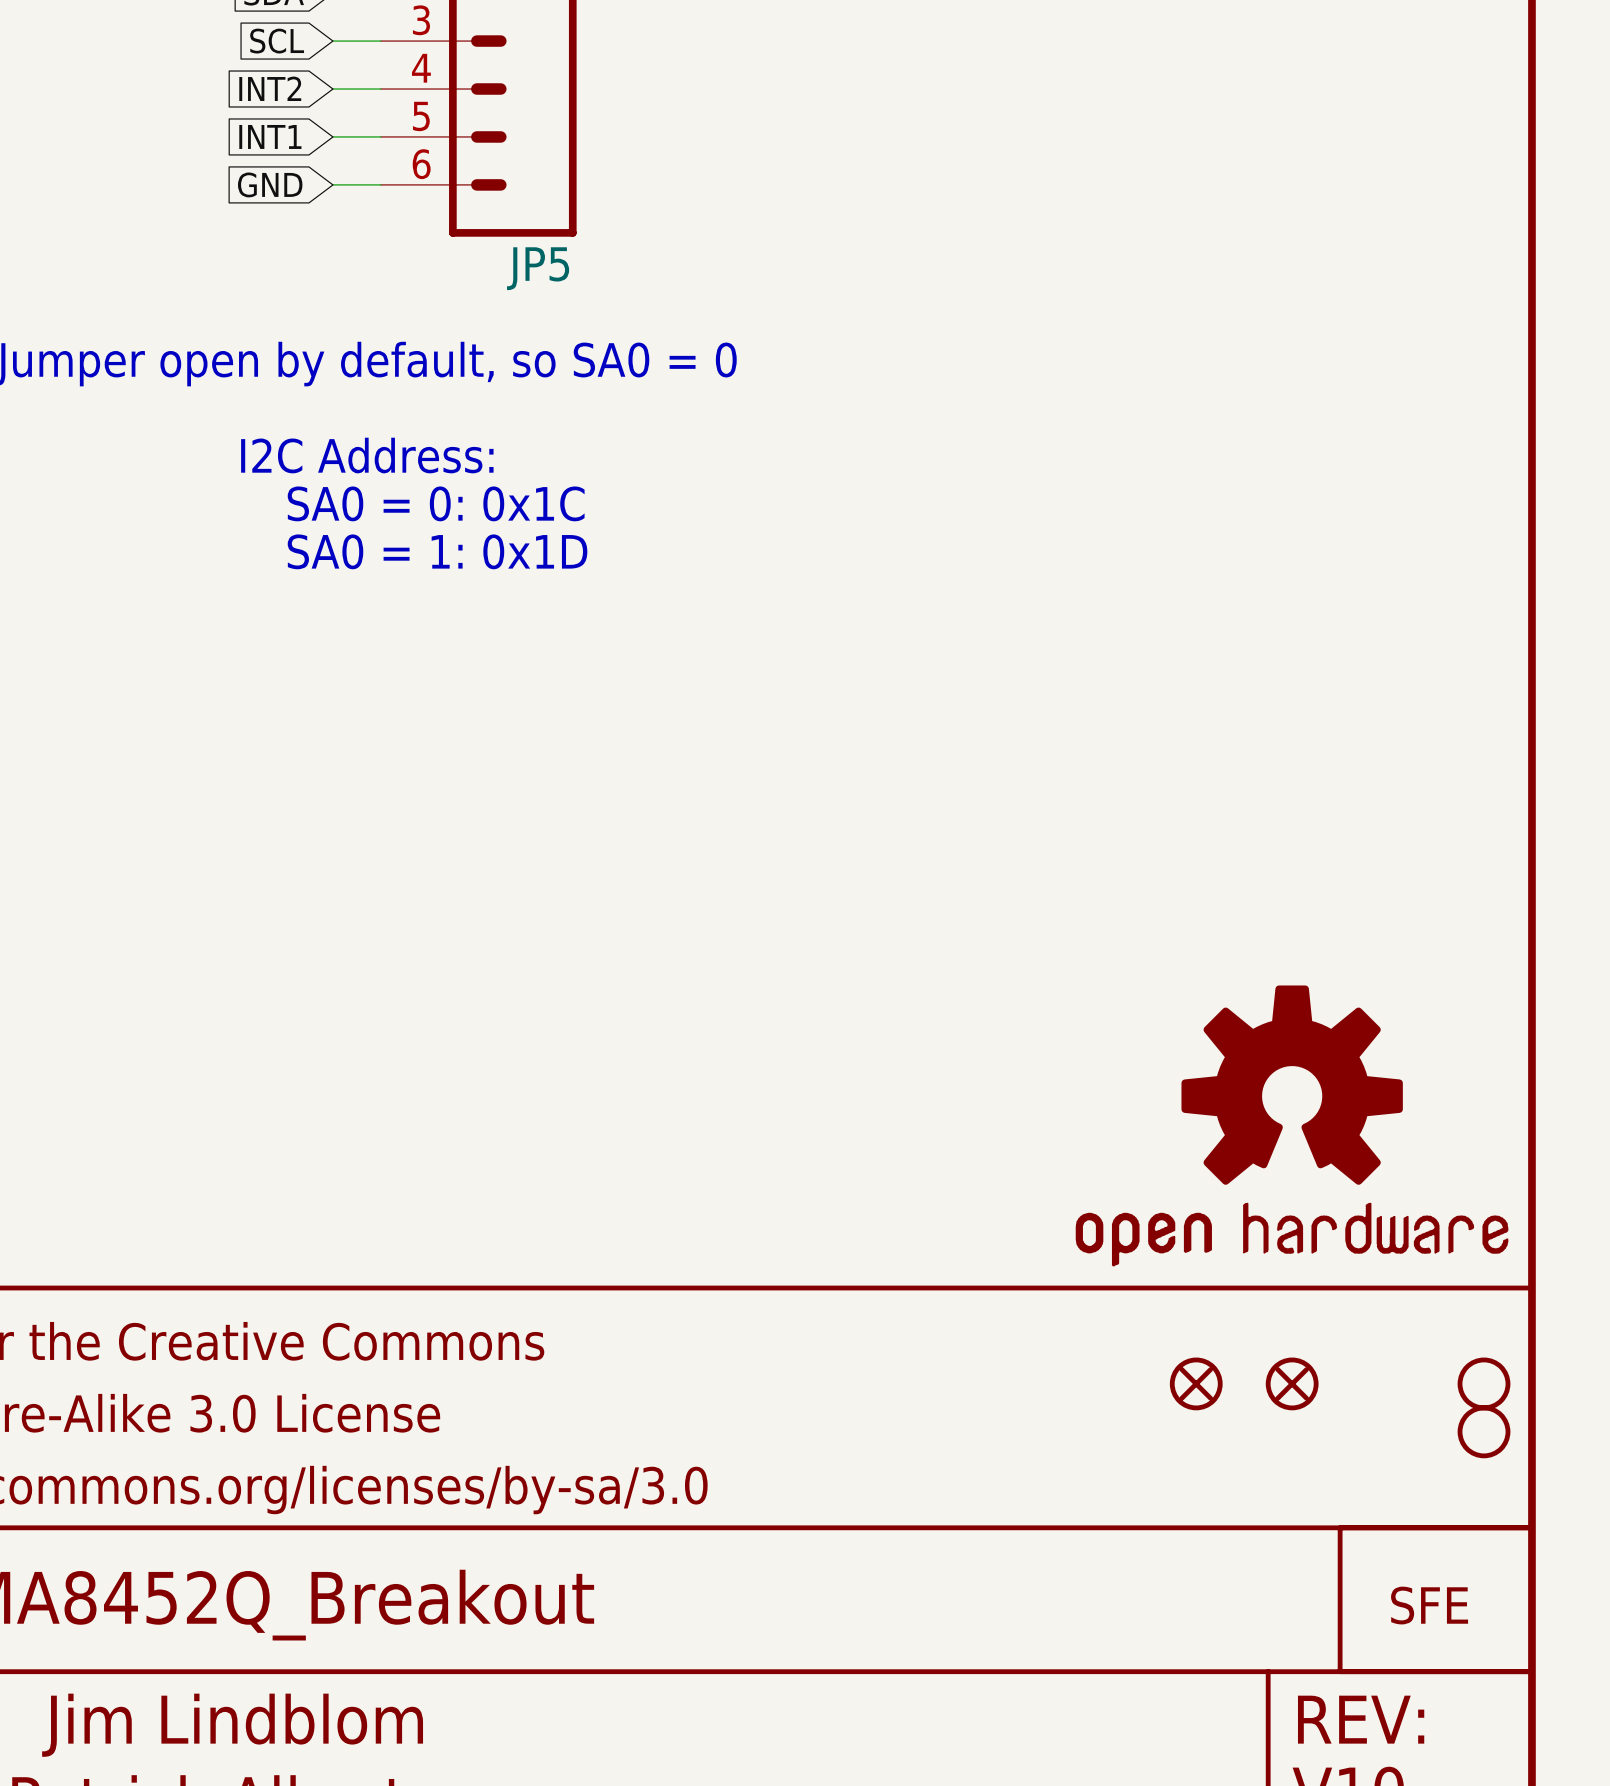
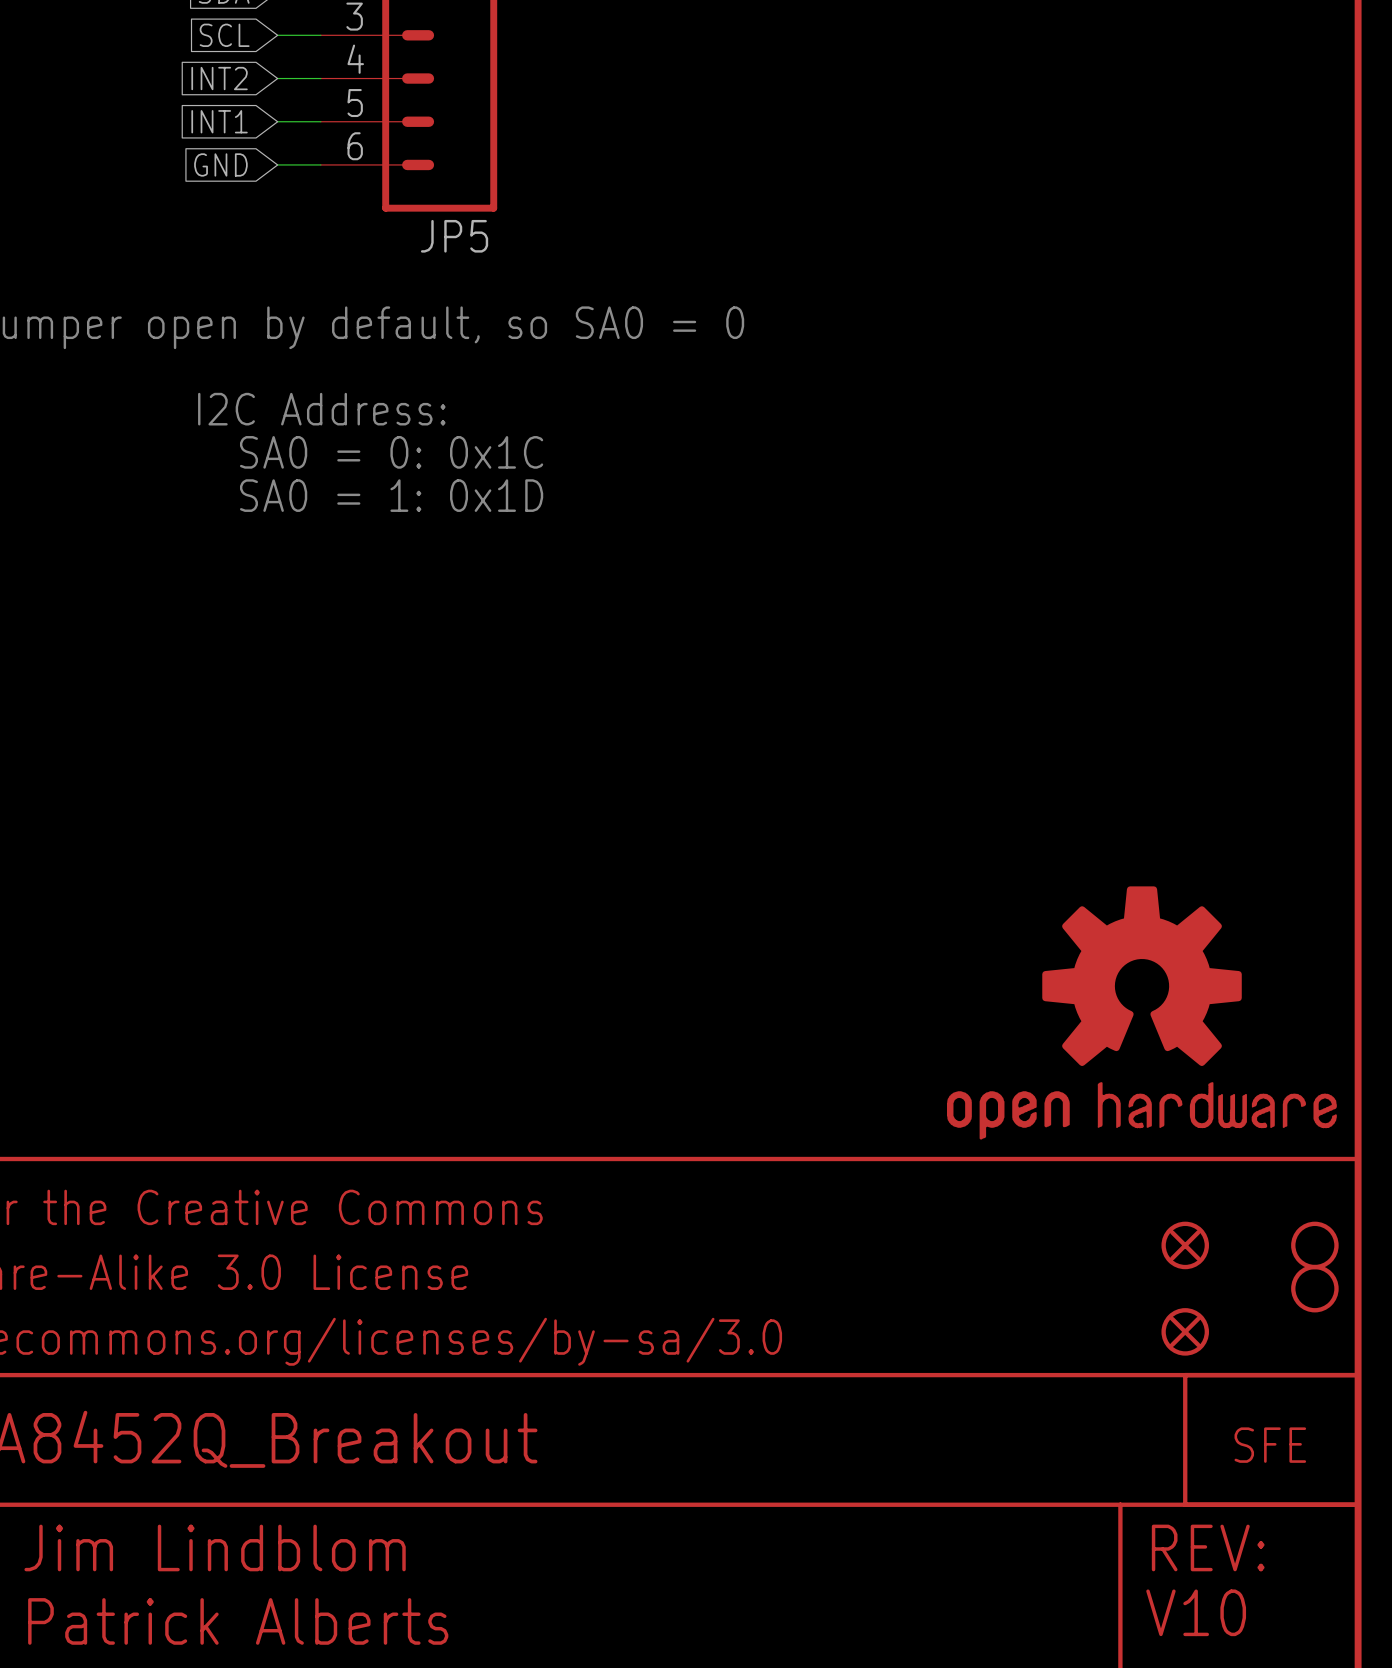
part: (1196, 1383) -> none
part position: (1292, 1383) -> (1185, 1245)
part: none -> (1185, 1331)

